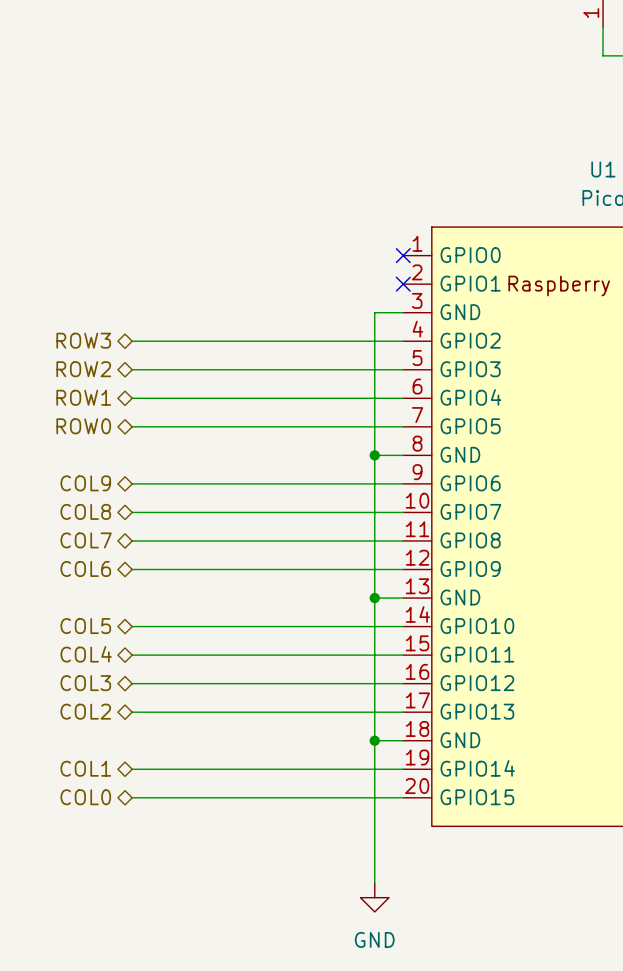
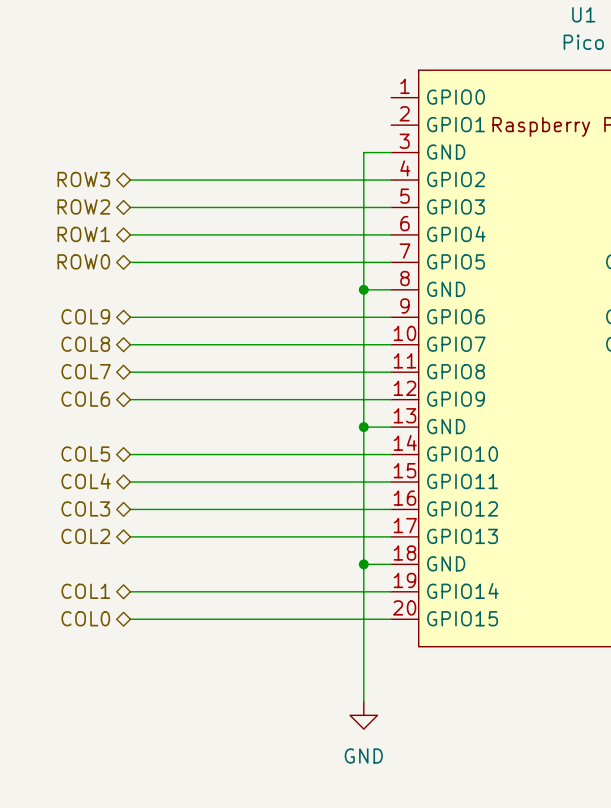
no-connect mark: (403, 255) -> none
no-connect mark: (403, 284) -> none

